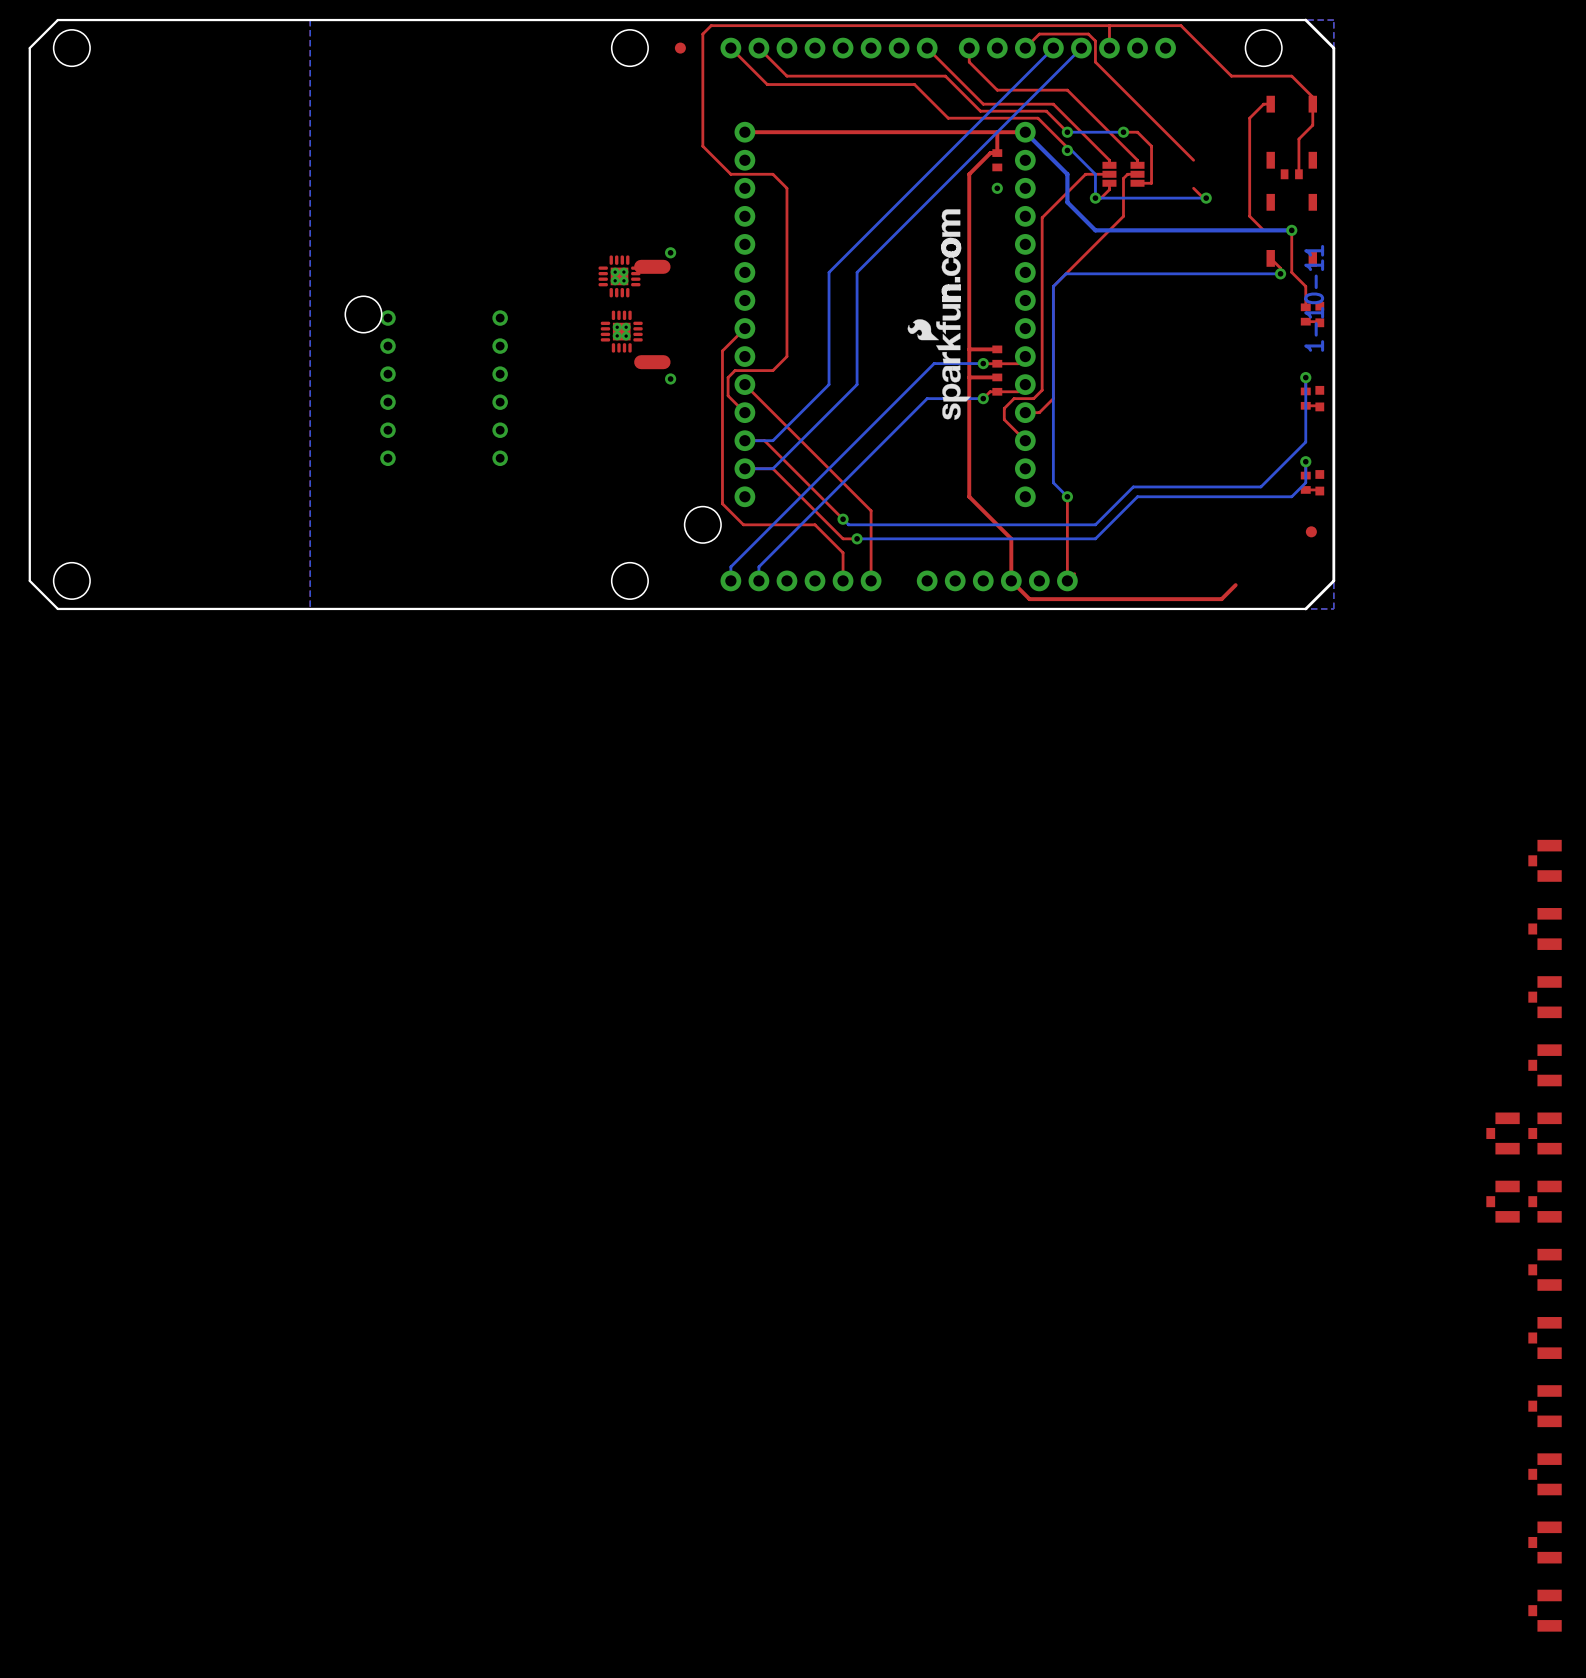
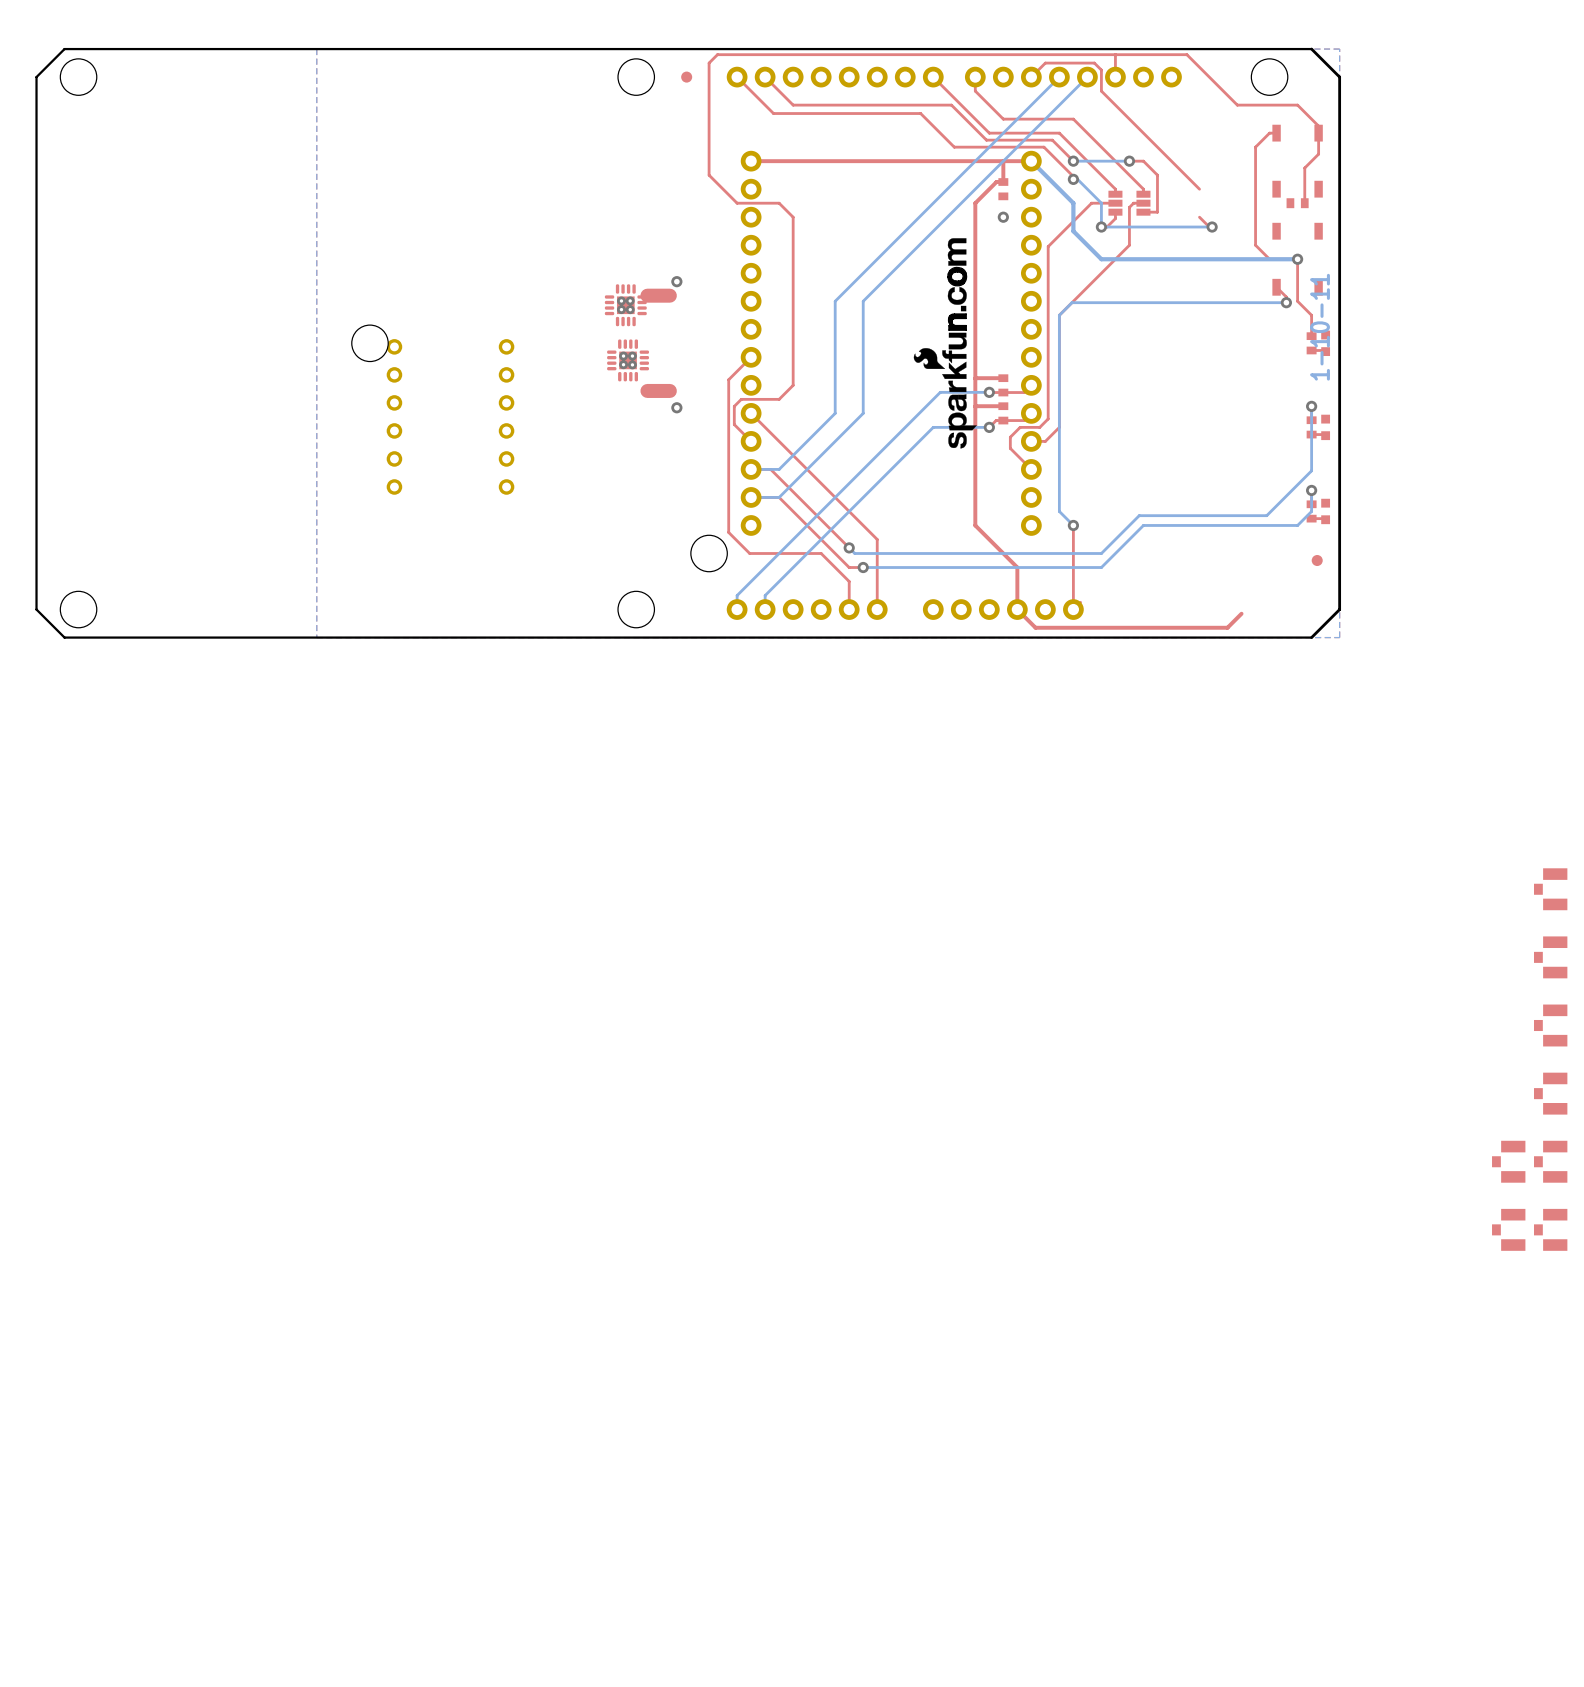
part: (1545, 1269) -> none
part: (1545, 1337) -> none
part: (1545, 1406) -> none
part: (1545, 1474) -> none
part: (1545, 1542) -> none
part: (1545, 1610) -> none

